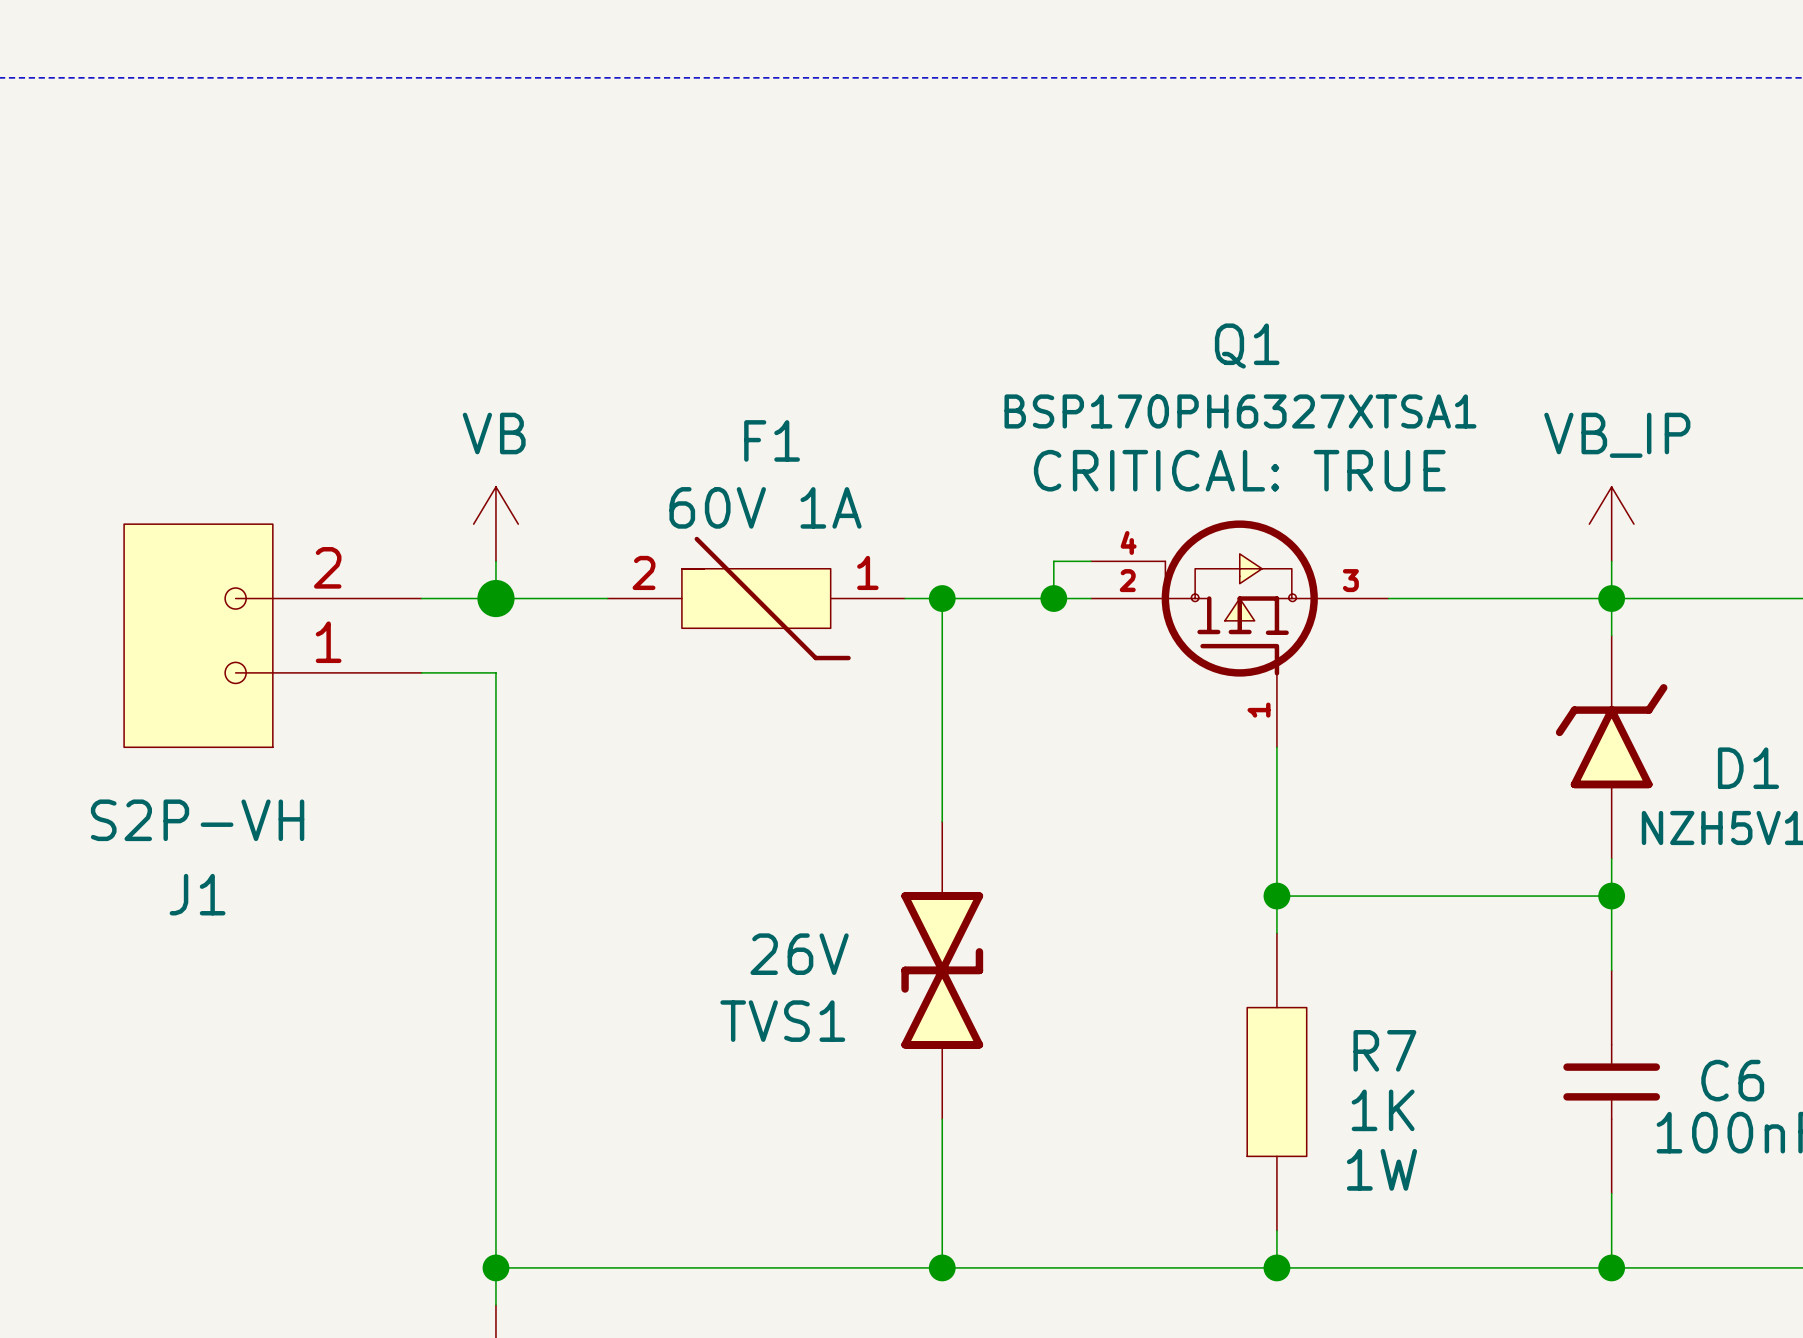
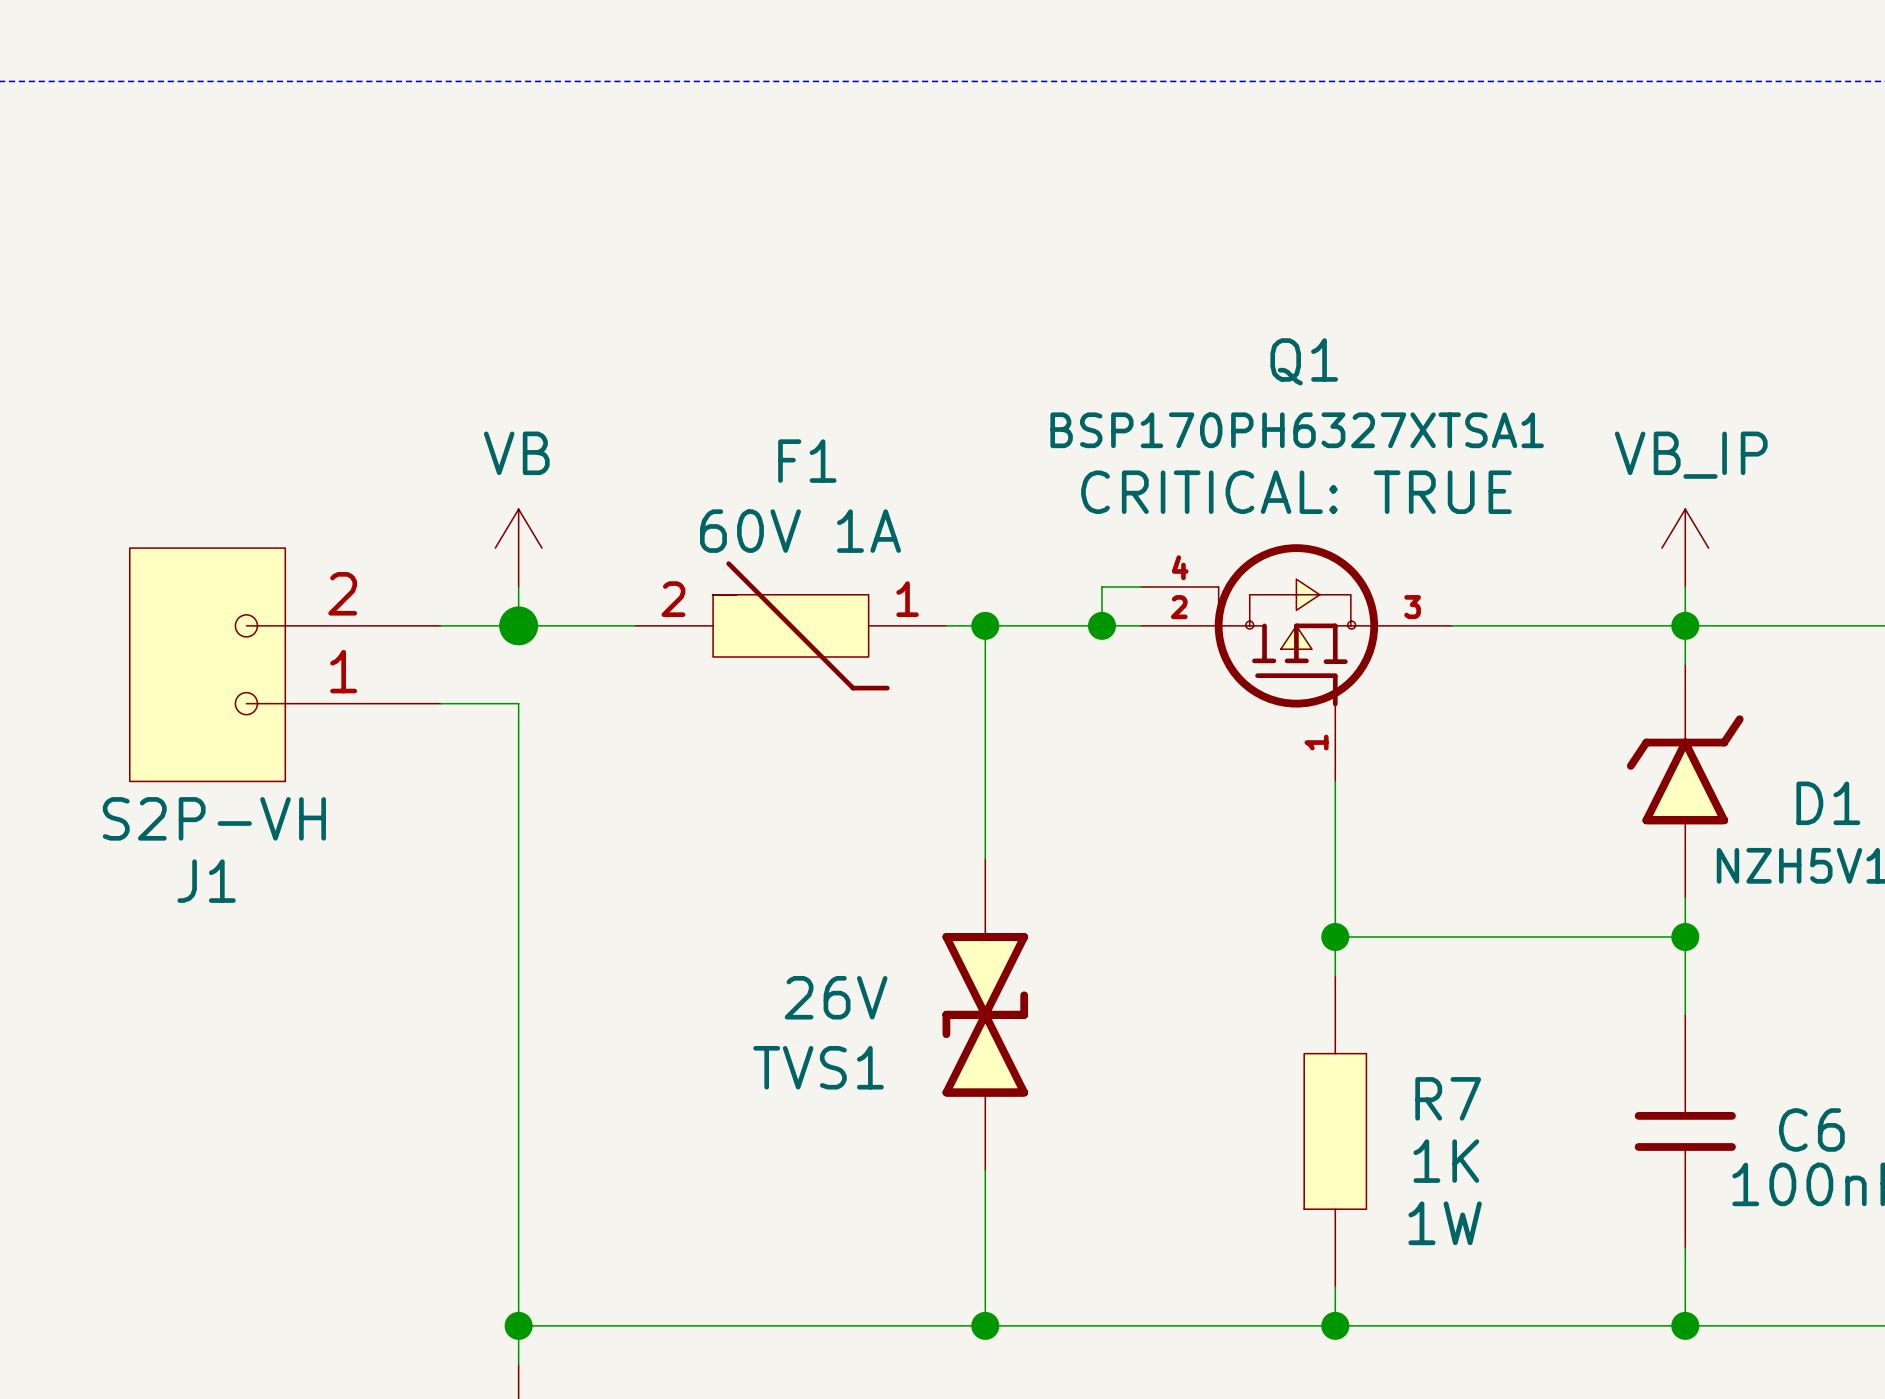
J1 value position: S2P-VH (197, 820) -> S2P-VH (214, 818)
J1 name position: J1 (197, 894) -> J1 (206, 881)

